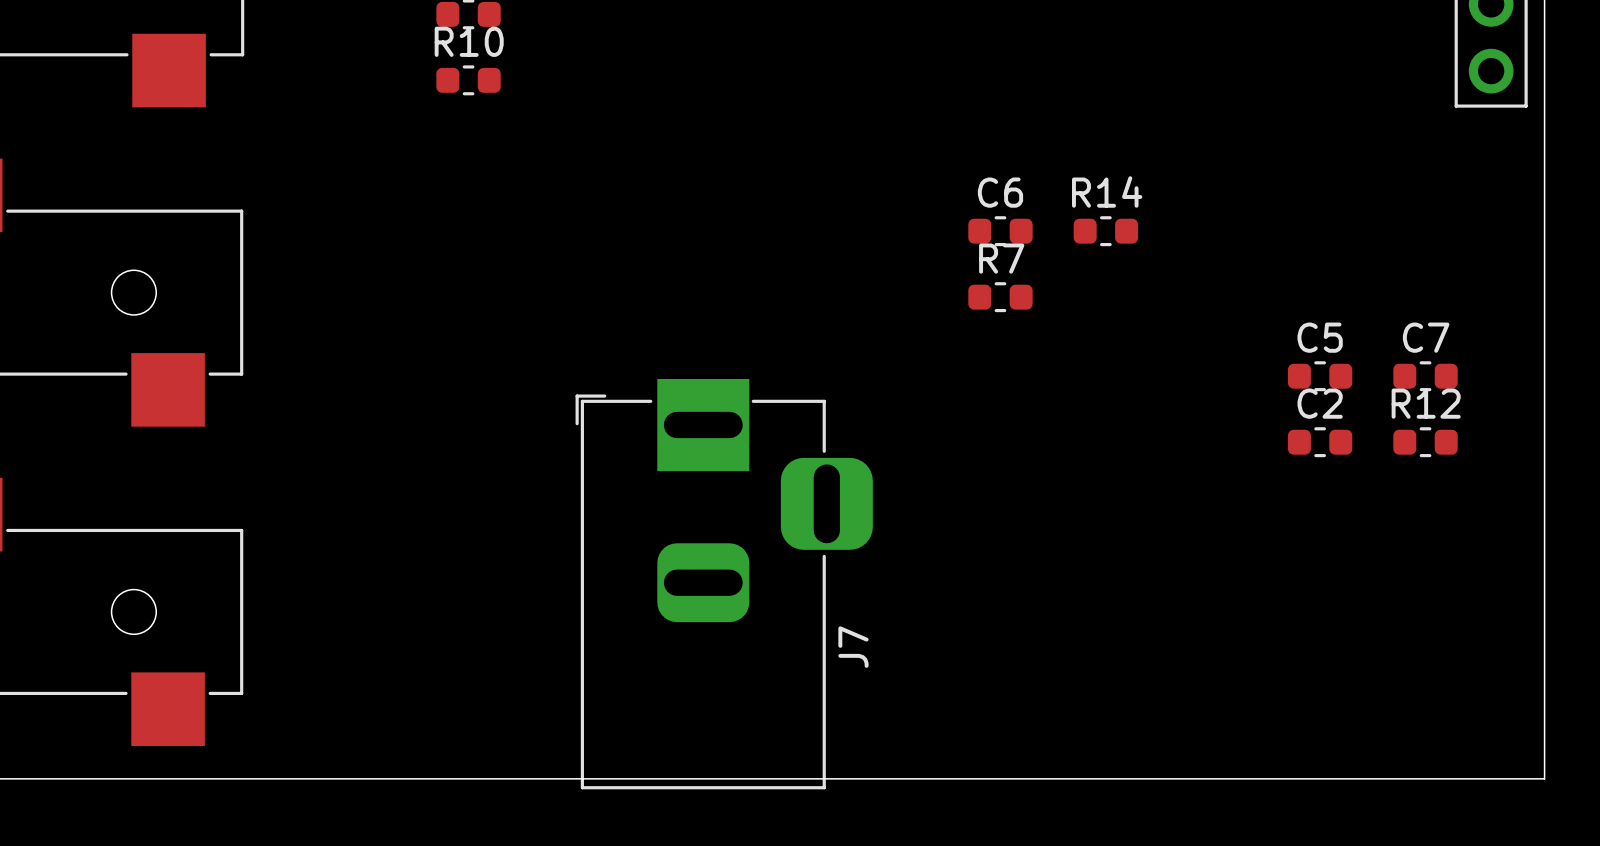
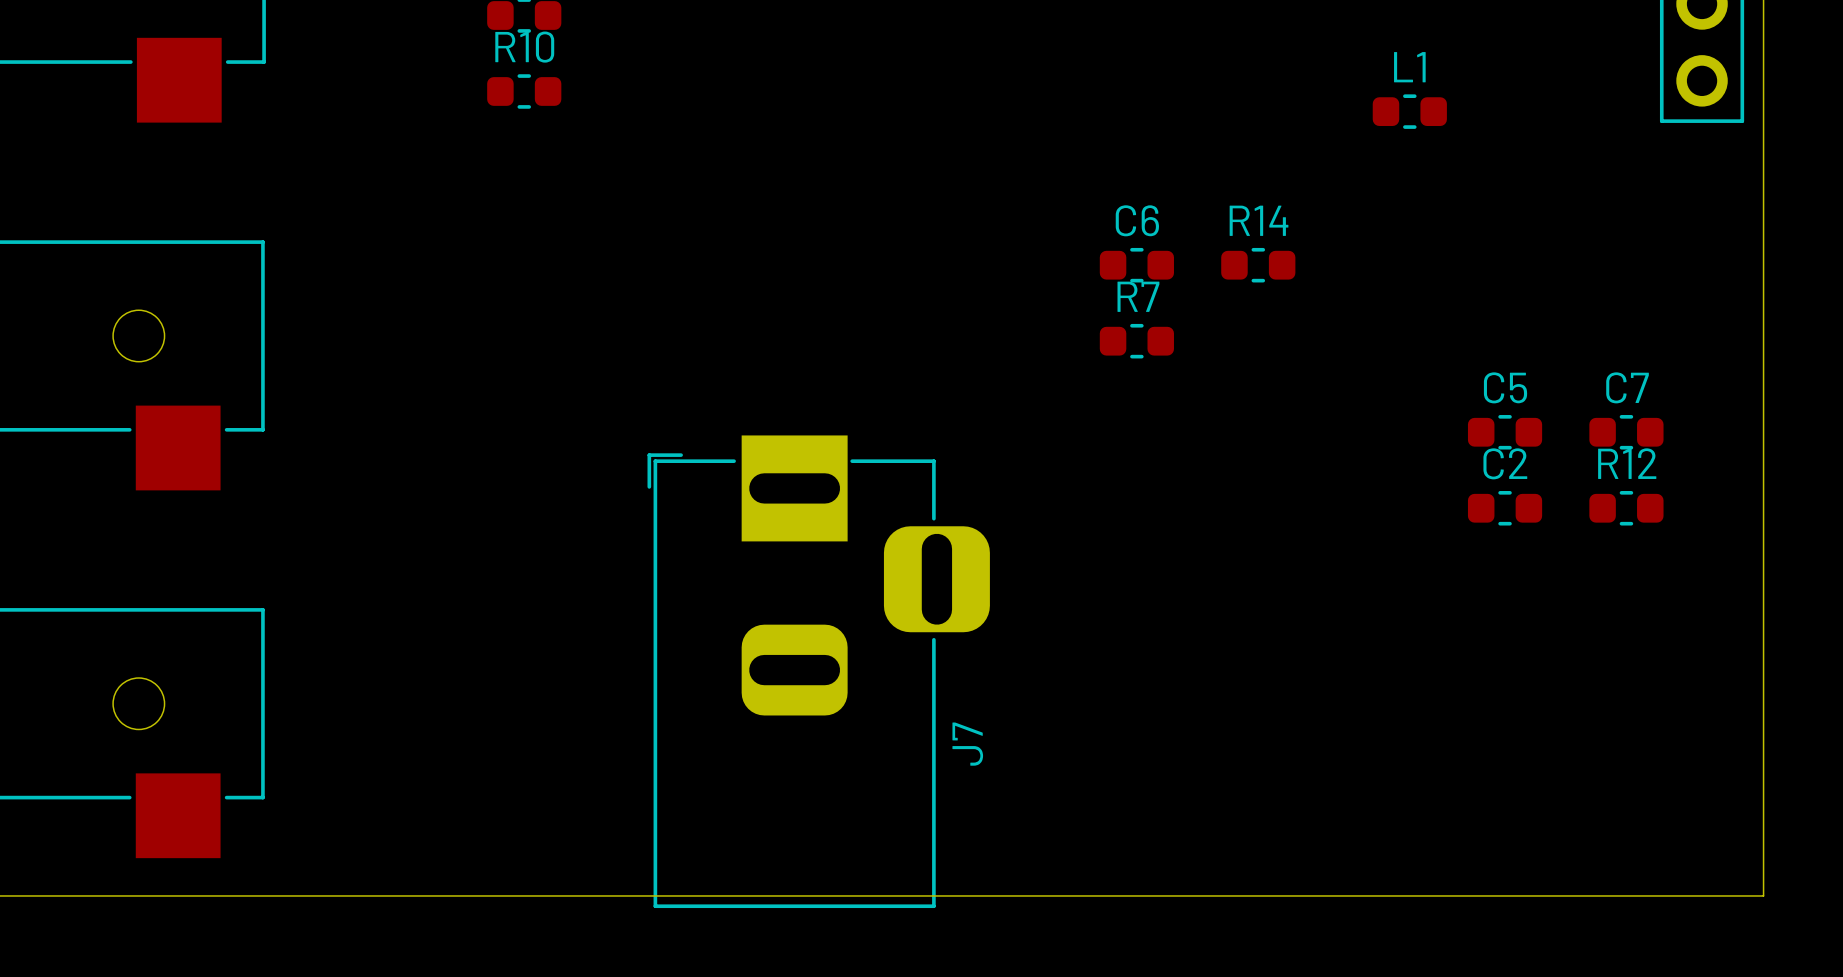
L1: none -> (1409, 111)

